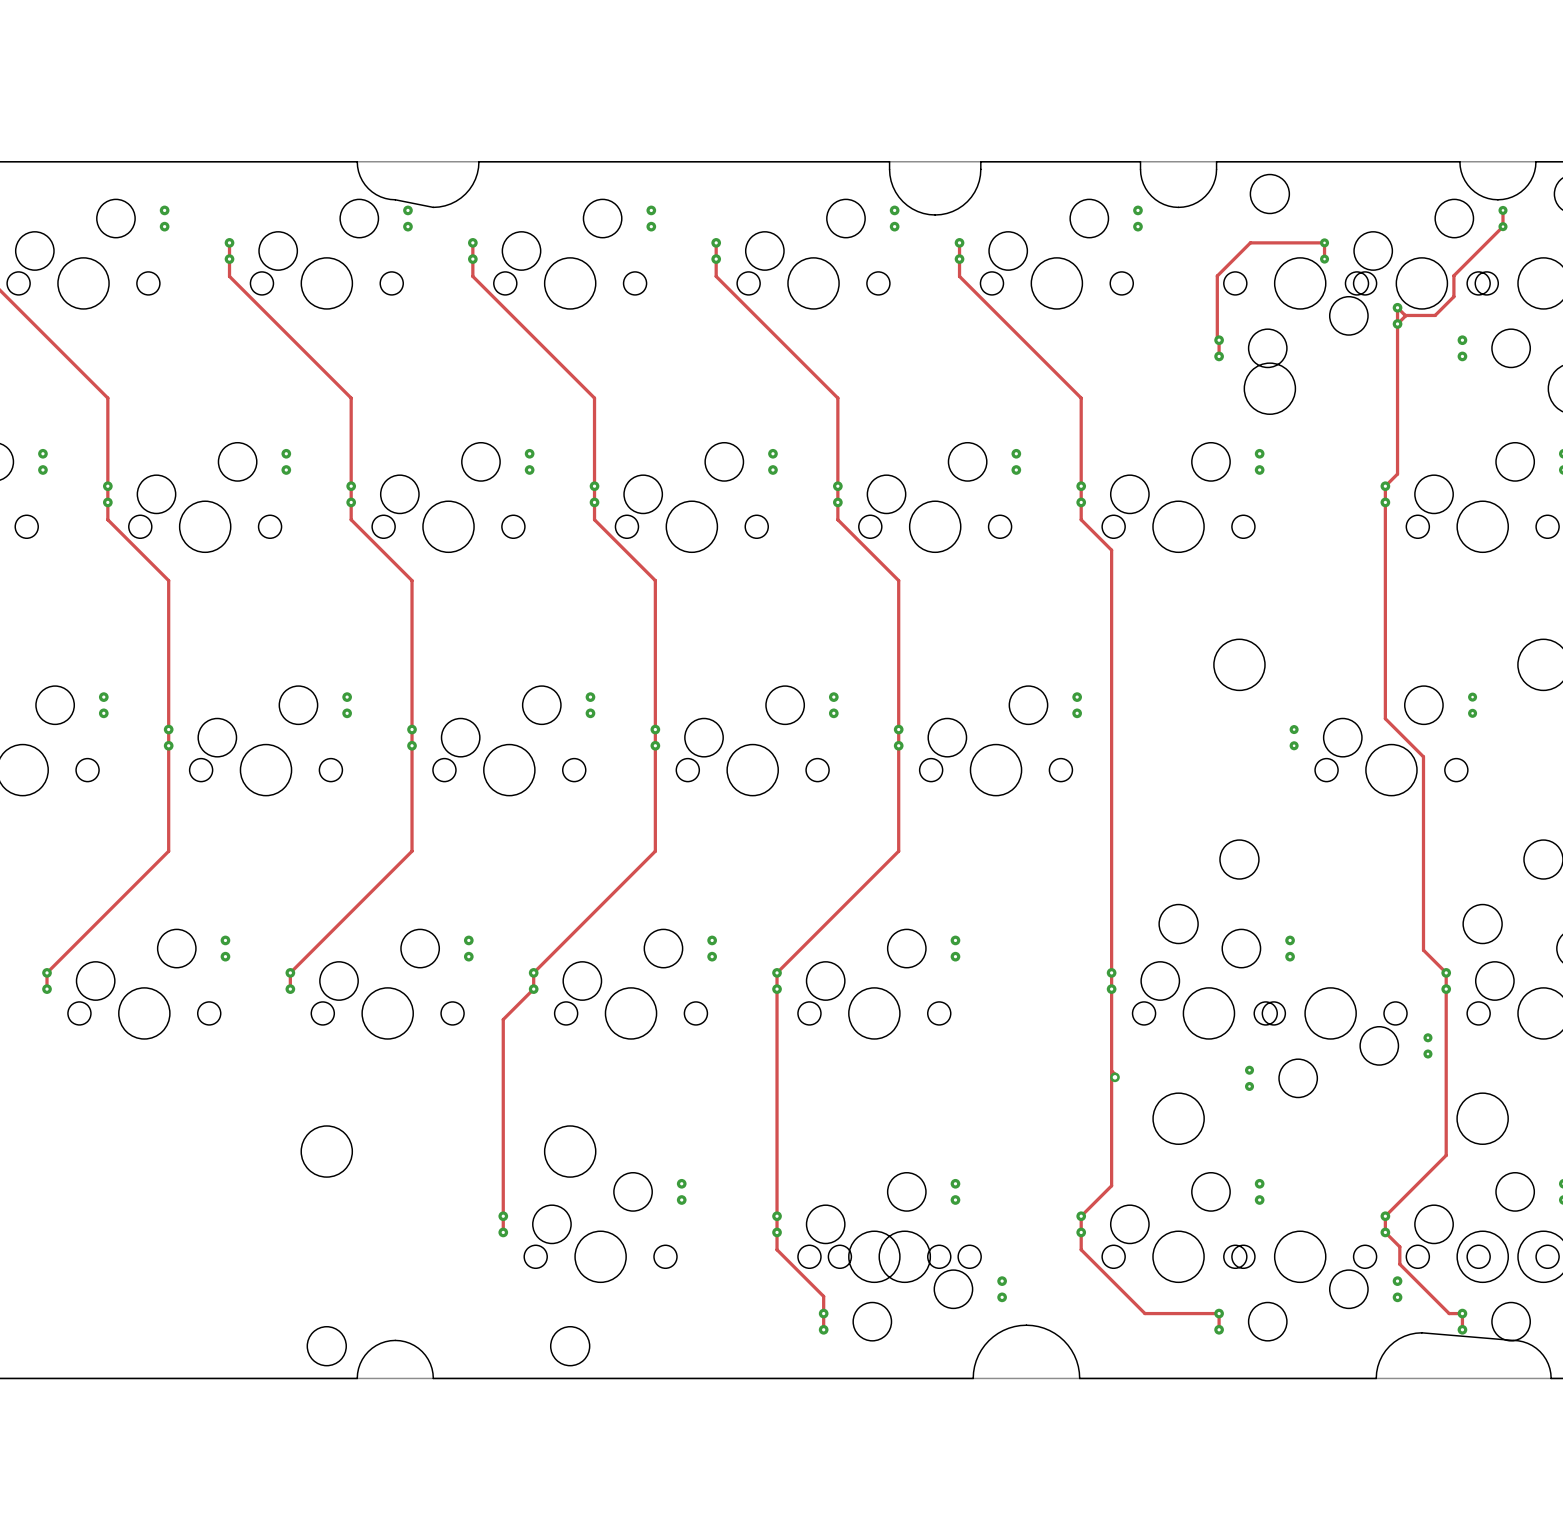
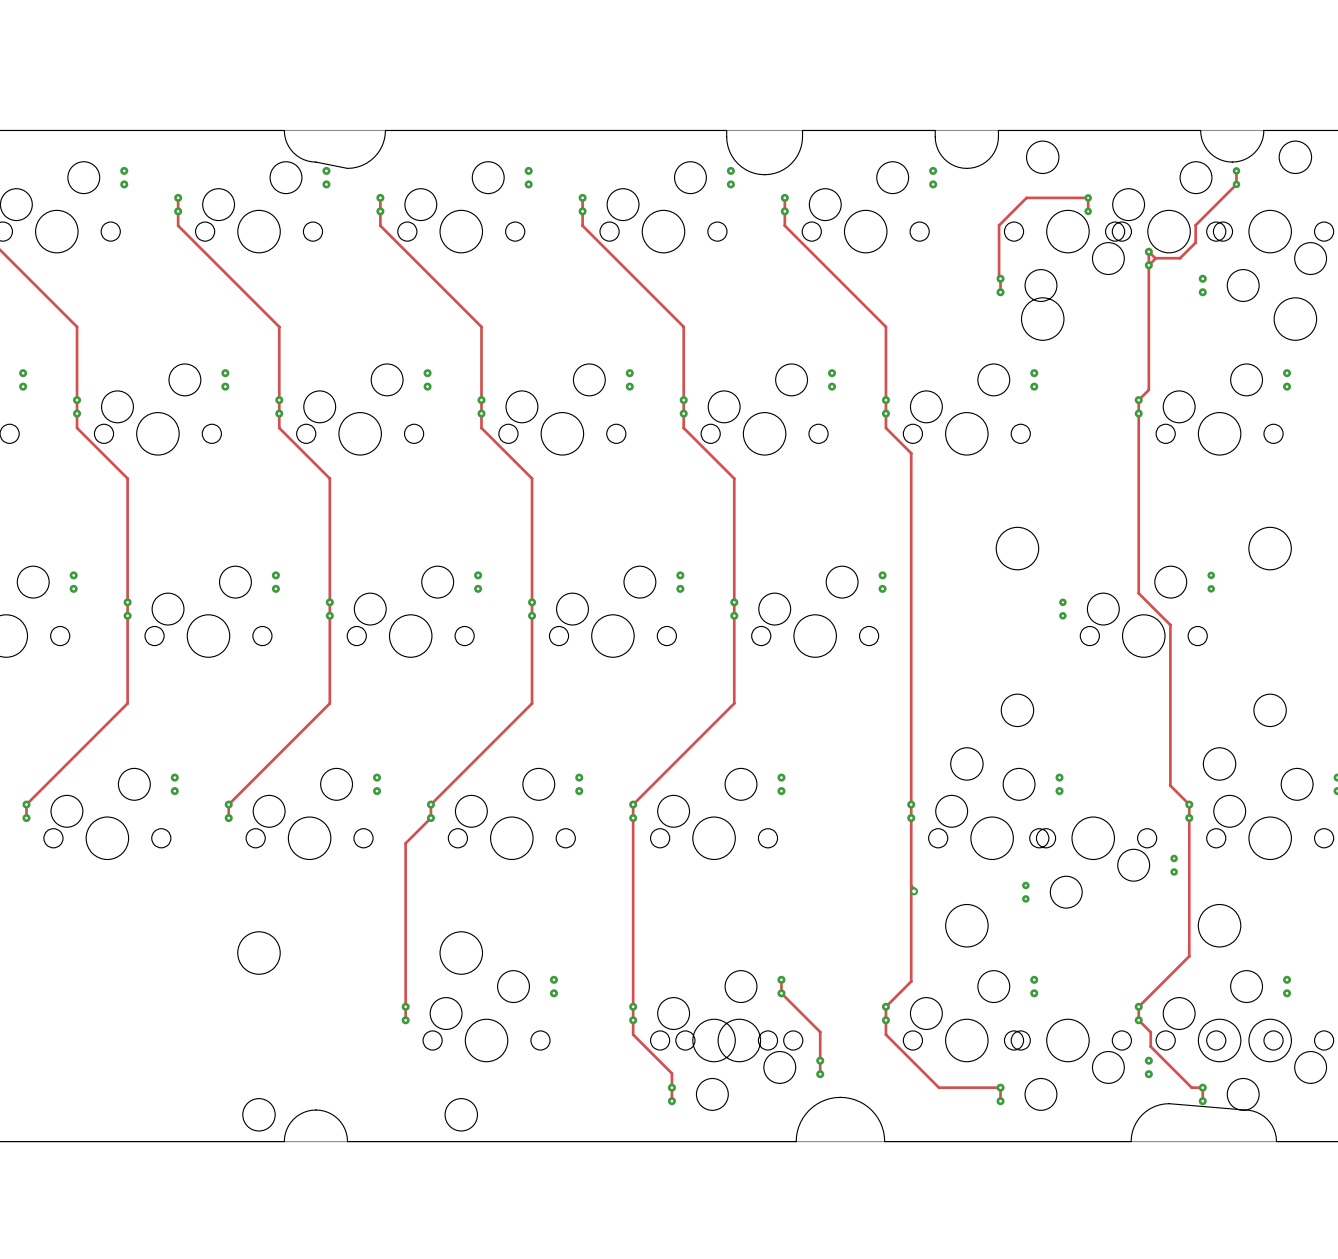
track: none -> (781, 979) (781, 993) (820, 1032) (820, 1074)

